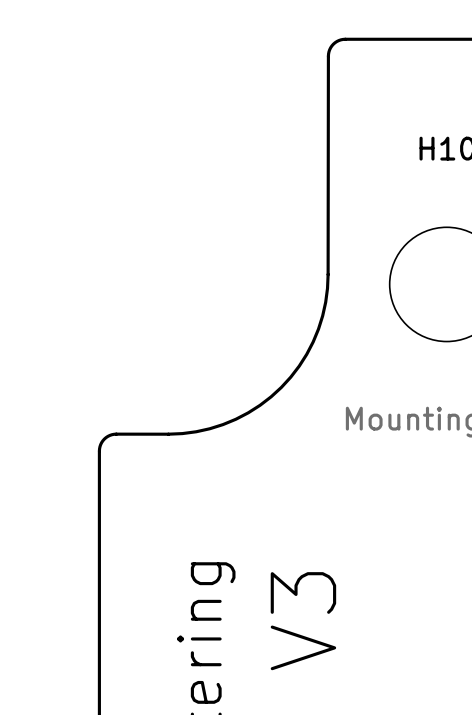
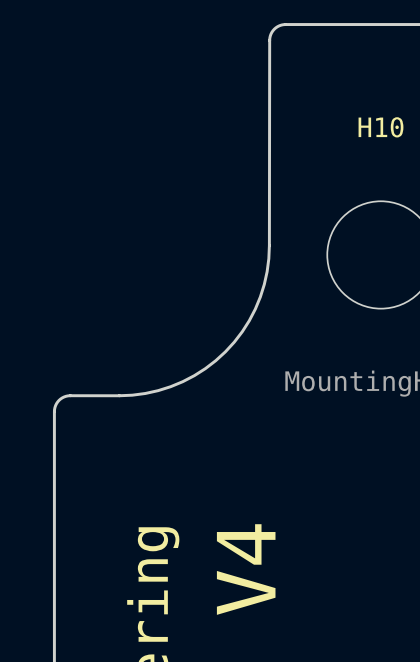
text: V3 (303, 621) -> V4 (246, 569)

